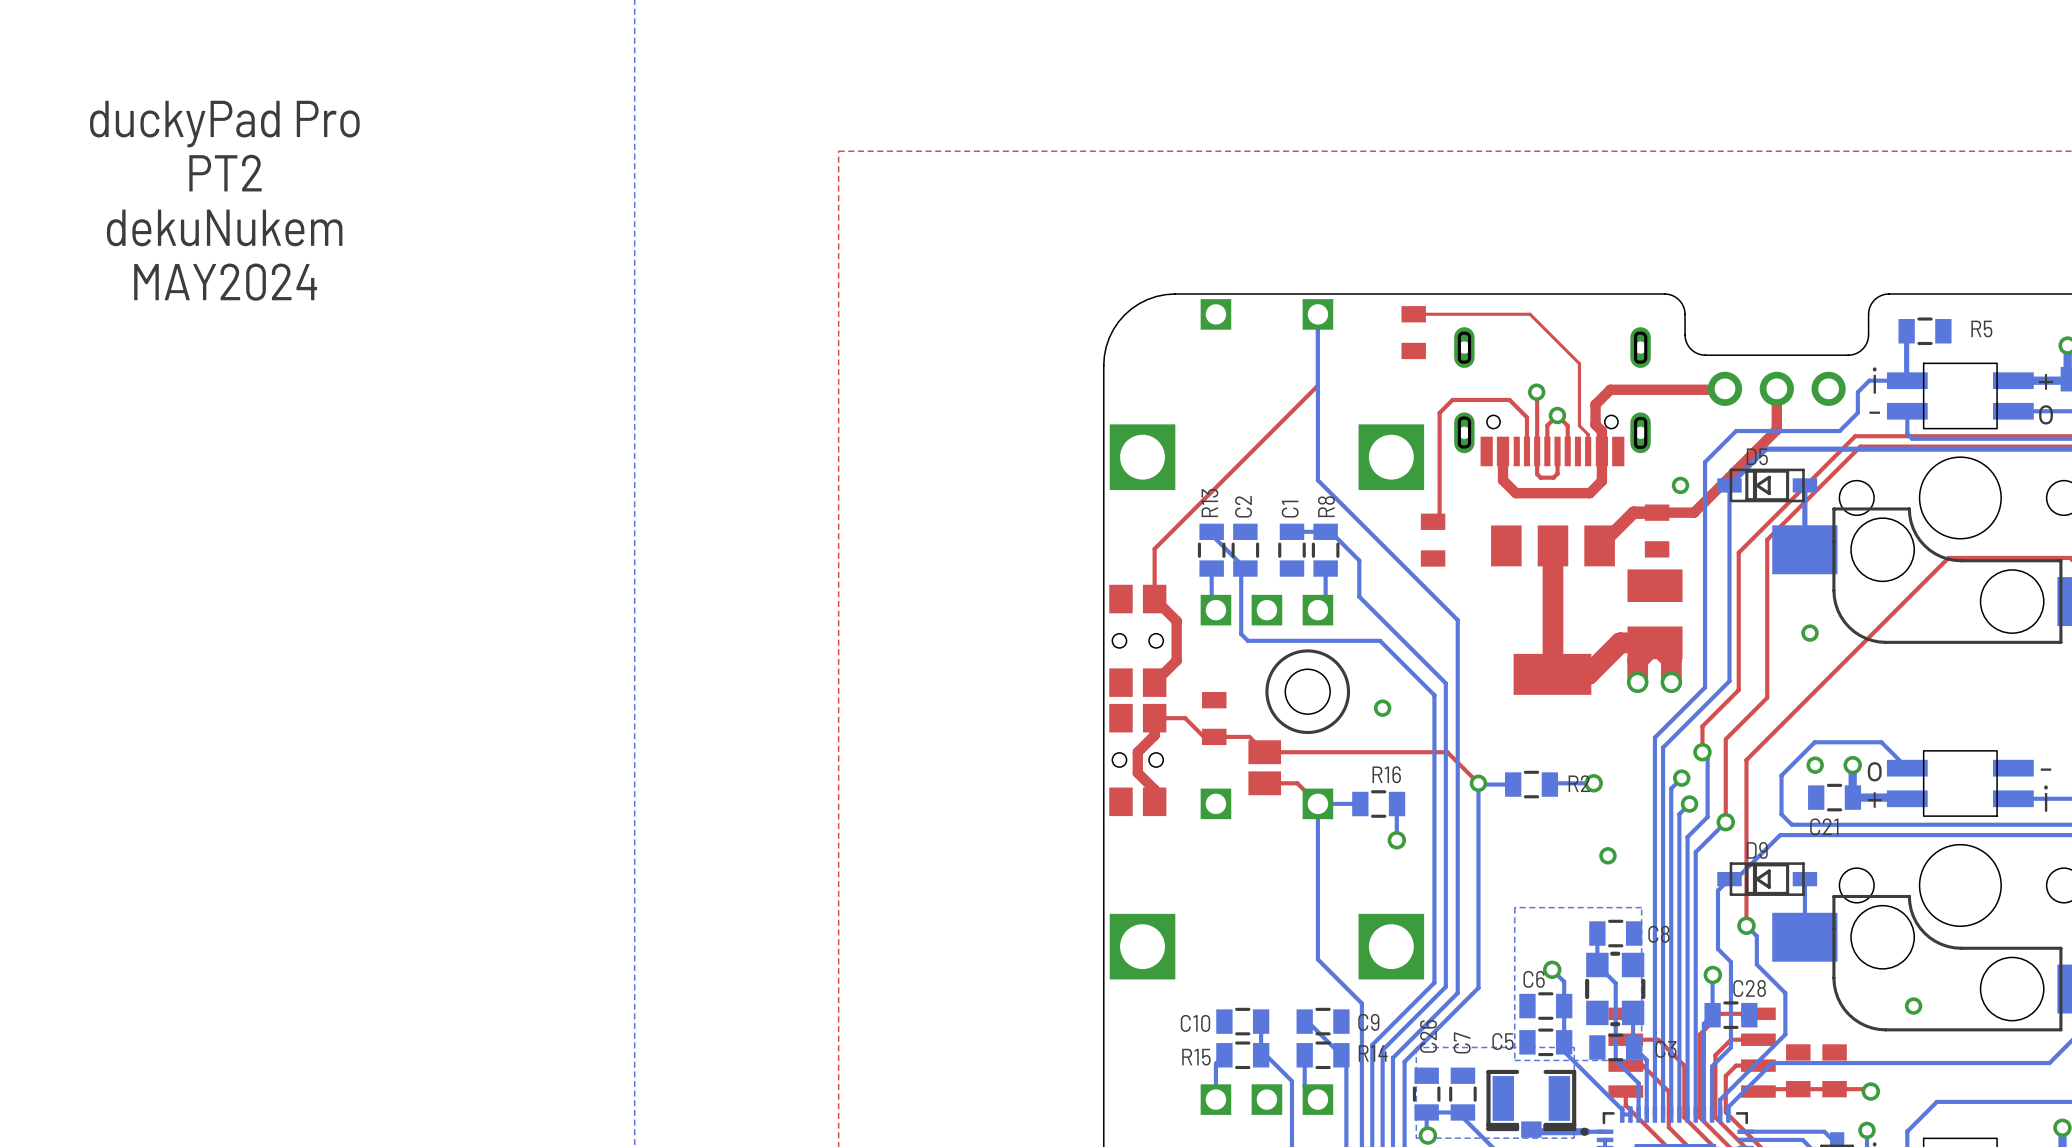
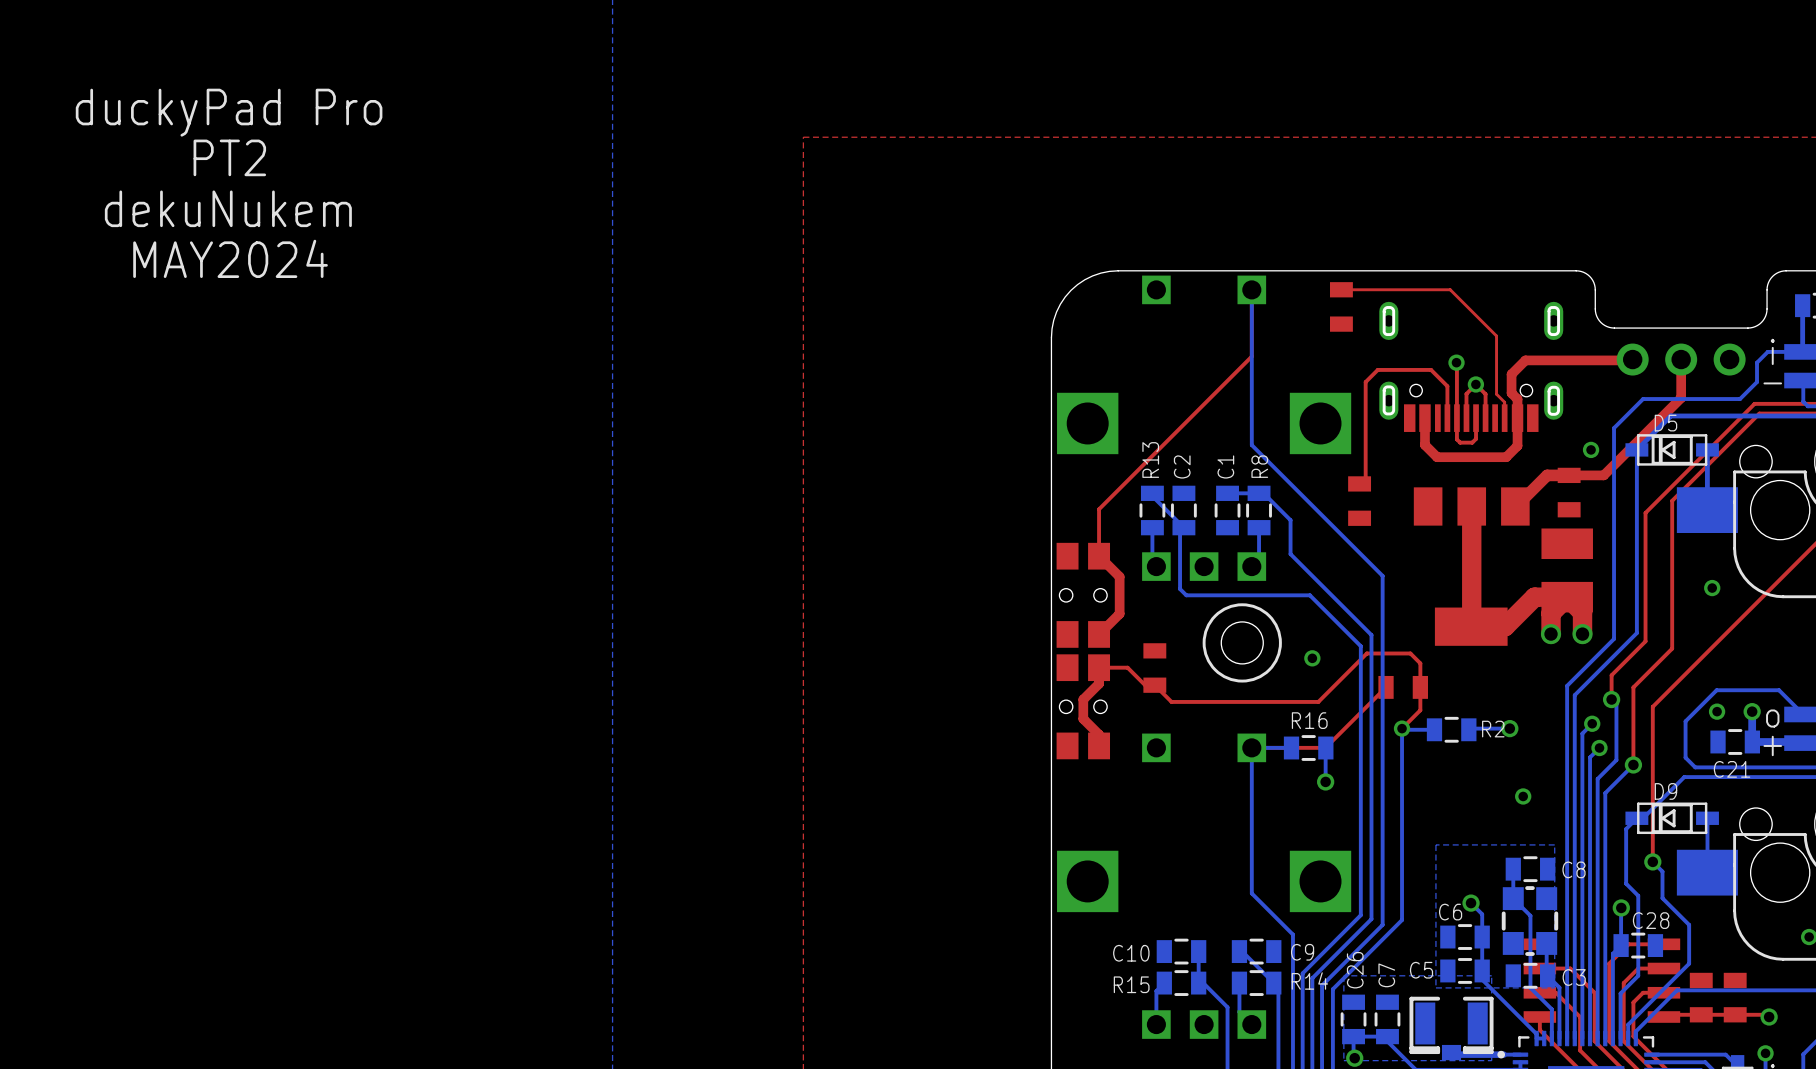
top track: (1214, 736) (1249, 736) (1264, 752) (1447, 752) (1478, 783) -> (1154, 685) (1171, 701) (1318, 701) (1366, 653) (1410, 653) (1420, 663) (1420, 710) (1402, 728)
part: none -> (1403, 687)
part: (1264, 767) -> none
top track: (1264, 783) (1297, 783) (1317, 803) -> (1386, 687) (1325, 747) (1251, 747)

